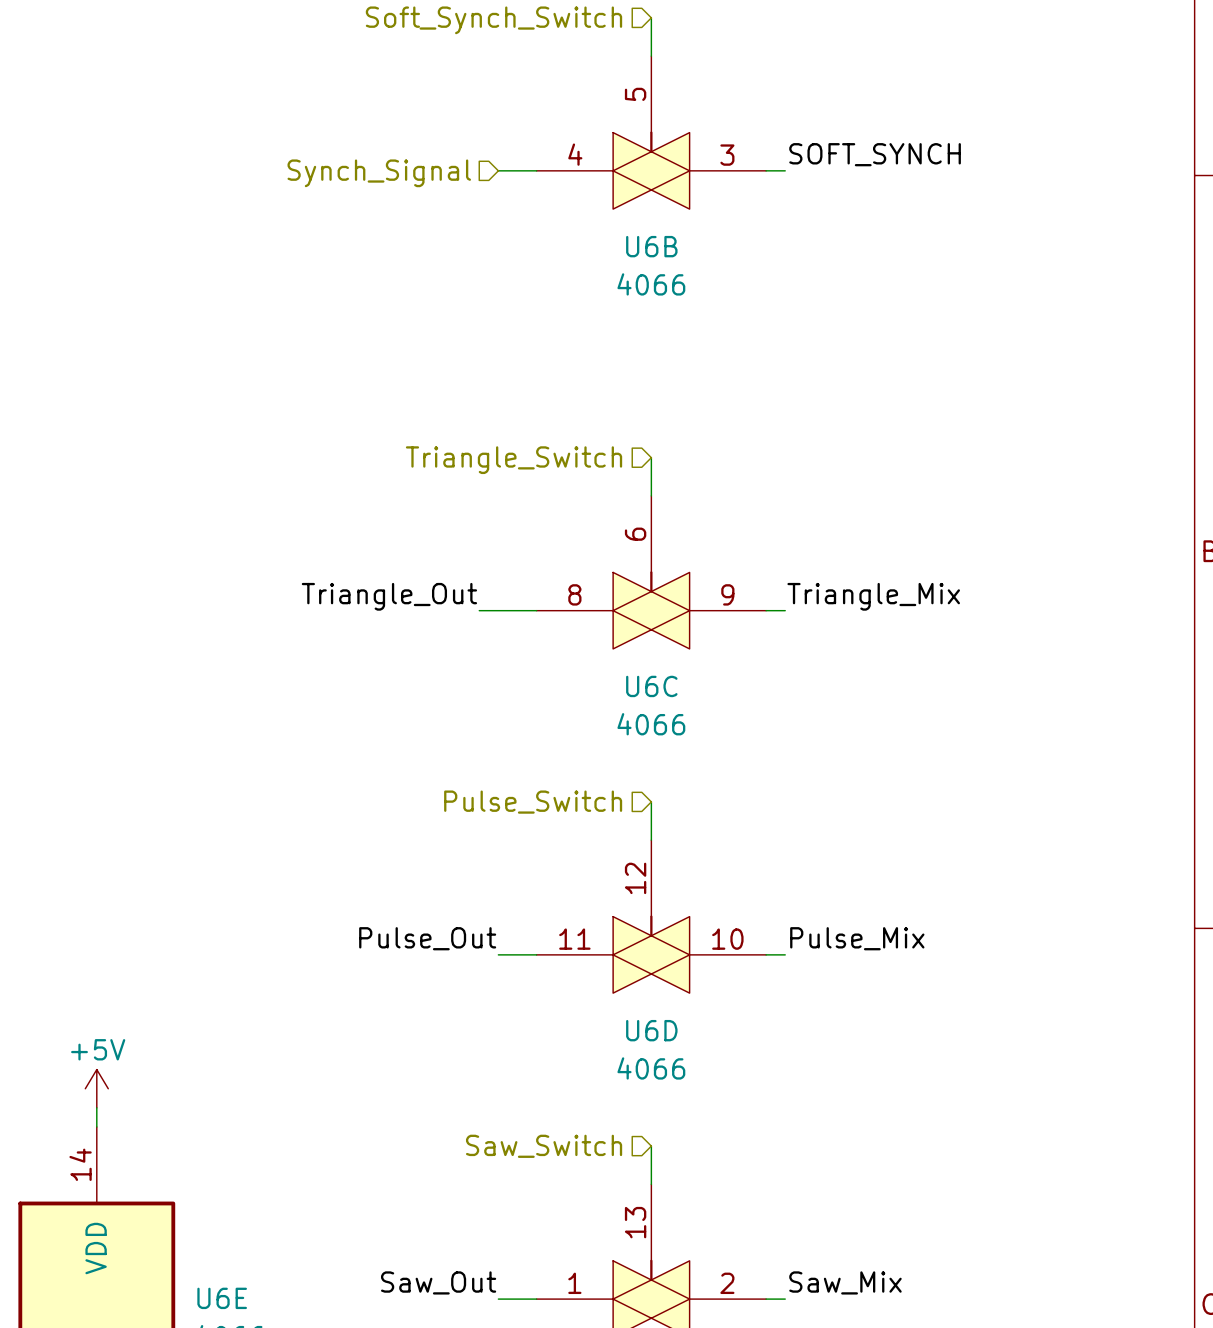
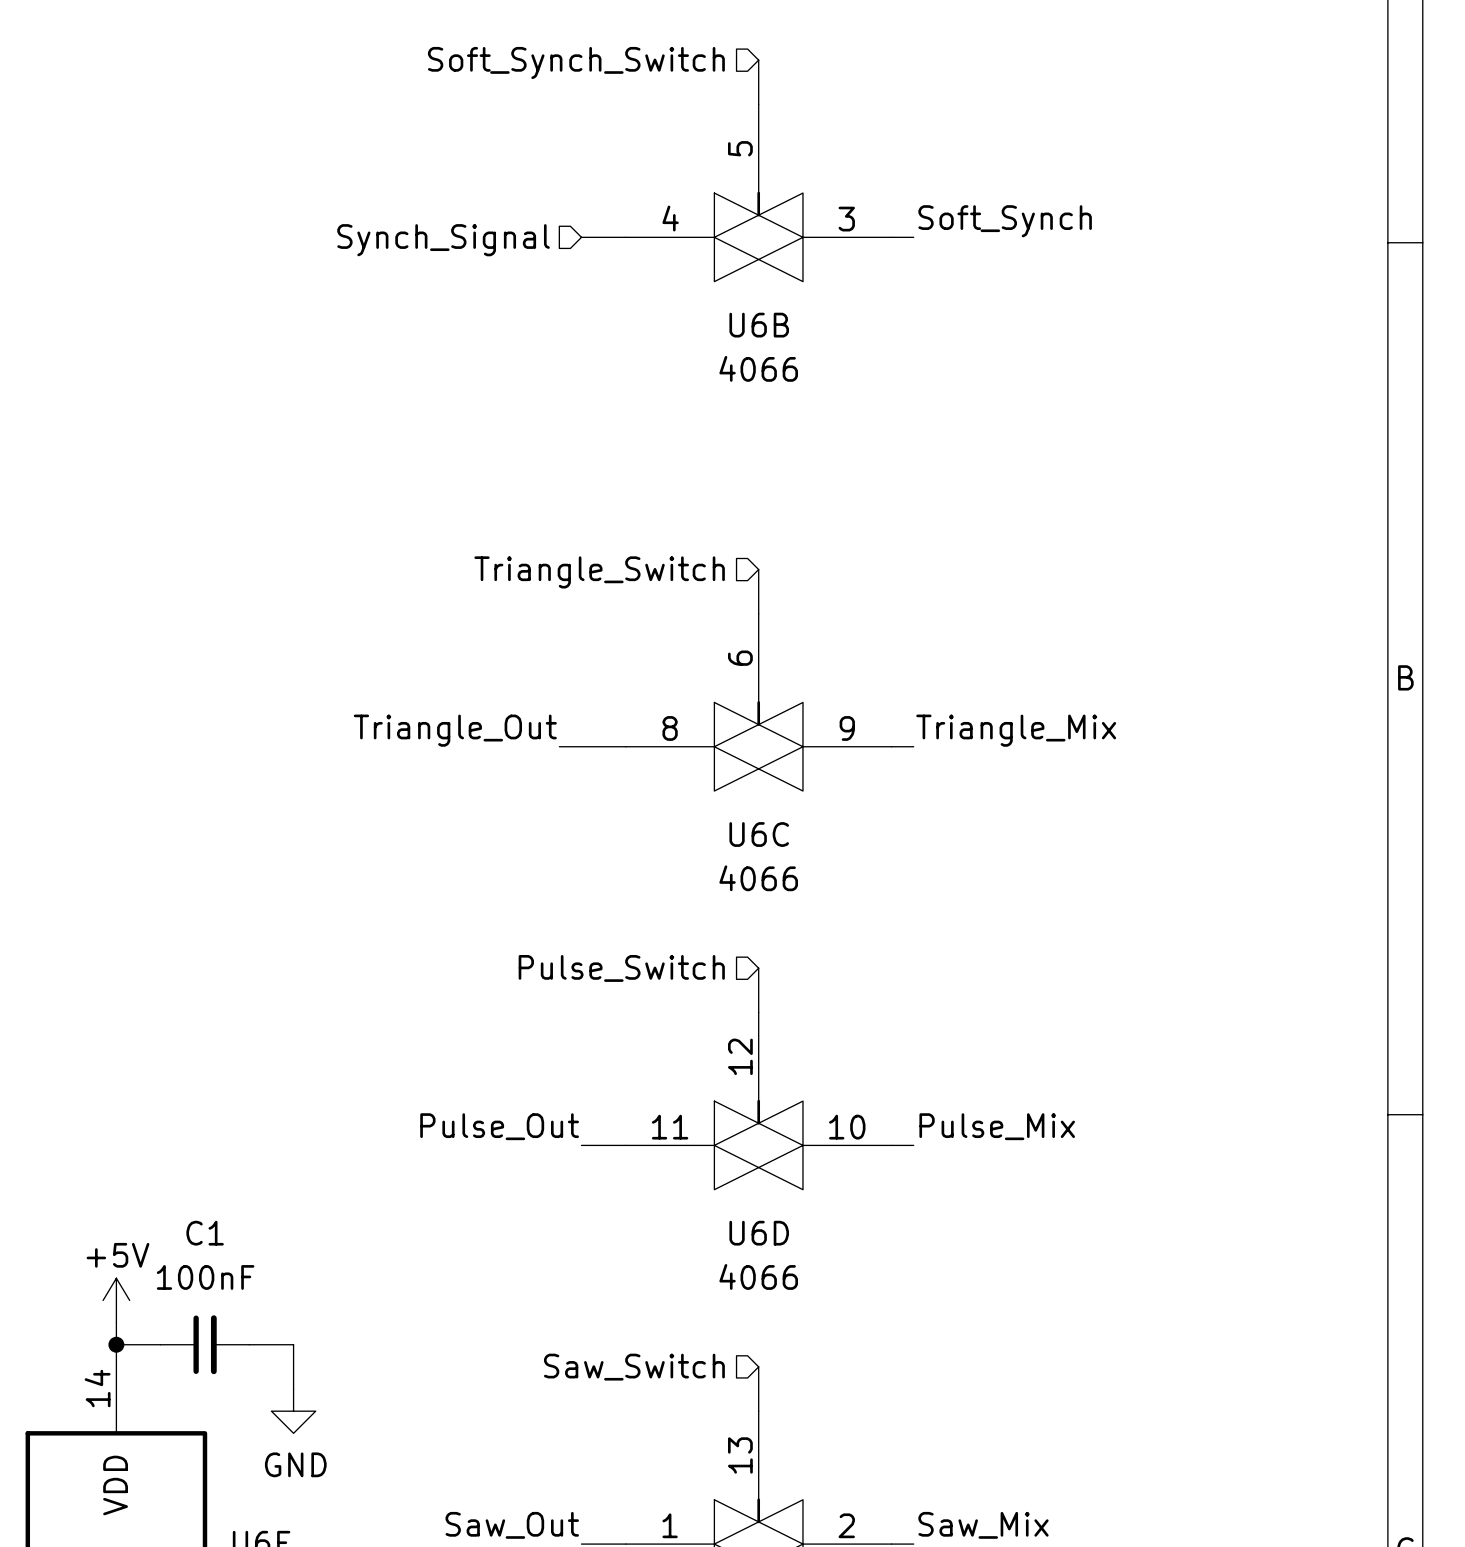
label: SOFT_SYNCH (875, 154) -> Soft_Synch (1005, 221)
wire: none -> (116, 1344) (160, 1344)
junction: none -> (116, 1344)
C1: none -> 100nF (204, 1344)
wire: none -> (249, 1344) (293, 1344) (293, 1389)
power symbol: none -> GND (293, 1411)

